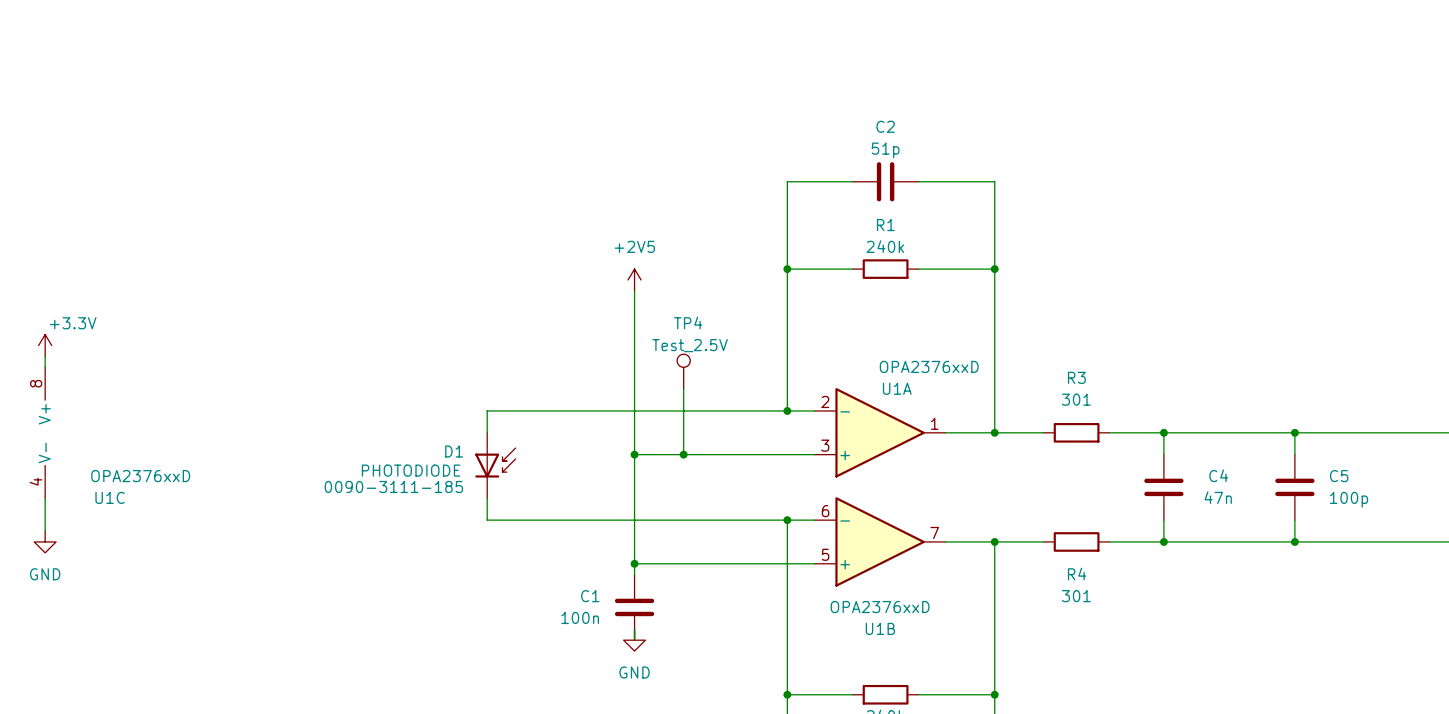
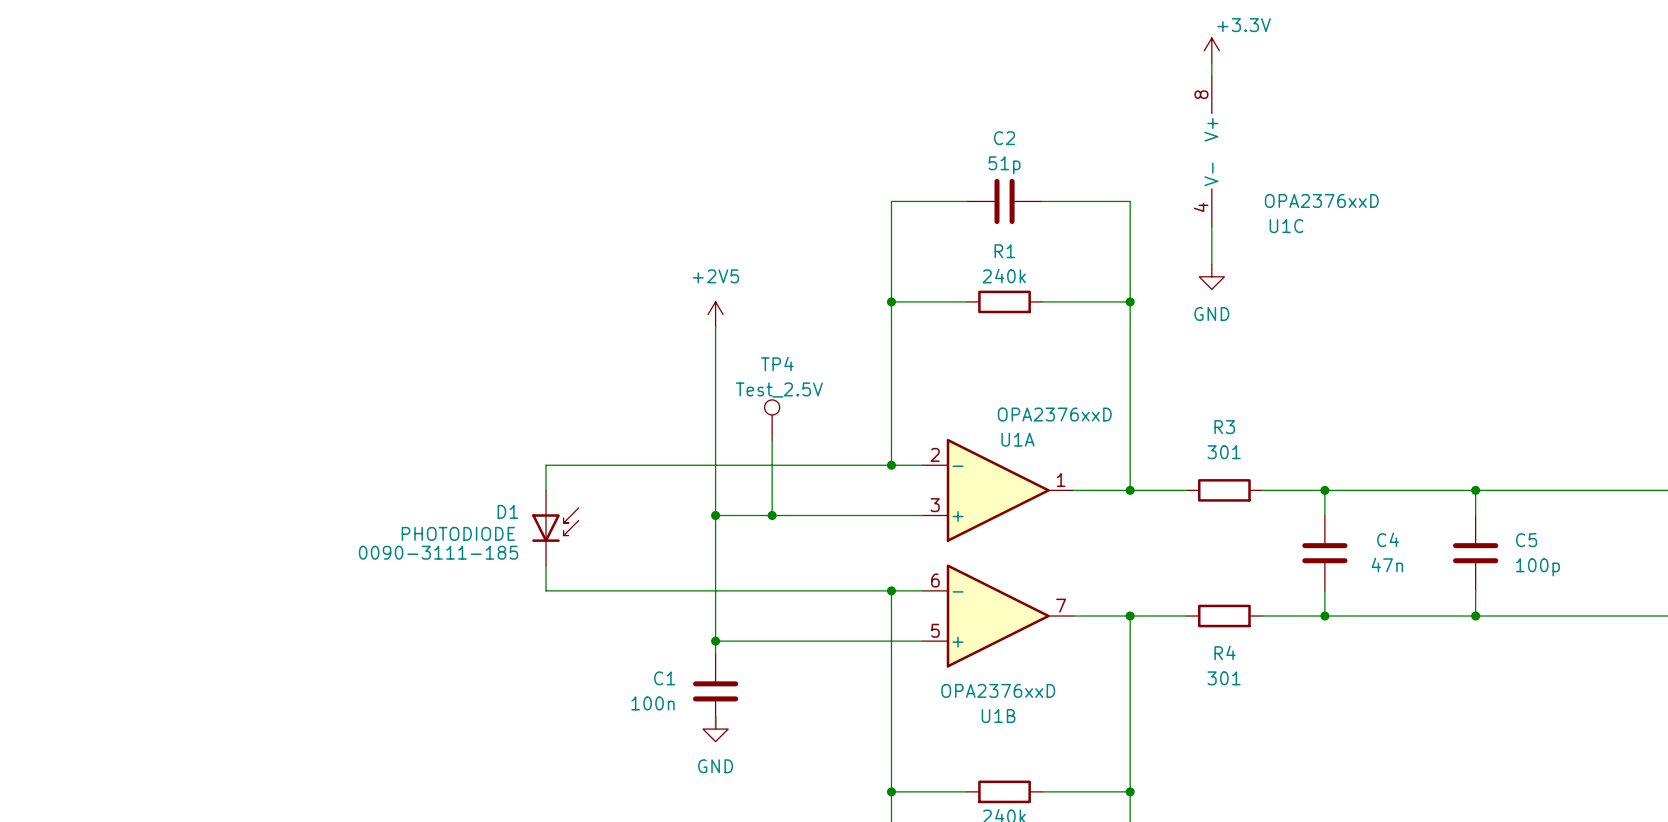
power symbol: none -> +3.3V (1211, 50)
wire: none -> (1211, 63) (1211, 75)
wire: none -> (1211, 226) (1211, 264)
power symbol: none -> GND (1211, 276)
power symbol: +3.3V (45, 345) -> none
wire: (45, 356) (45, 367) -> none
U1C position: (45, 432) -> (1211, 151)
wire: (45, 498) (45, 531) -> none
power symbol: GND (45, 541) -> none

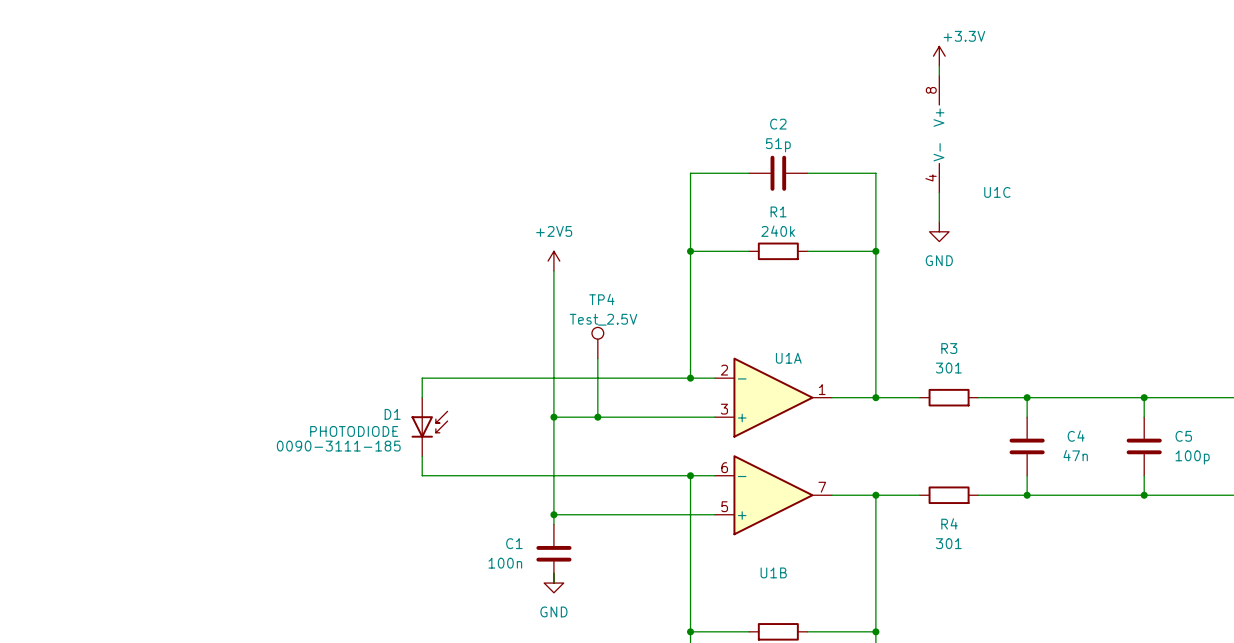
U1C value: OPA2376xxD (1321, 200) -> none
U1A value: OPA2376xxD (1054, 414) -> none
U1B value: OPA2376xxD (998, 690) -> none

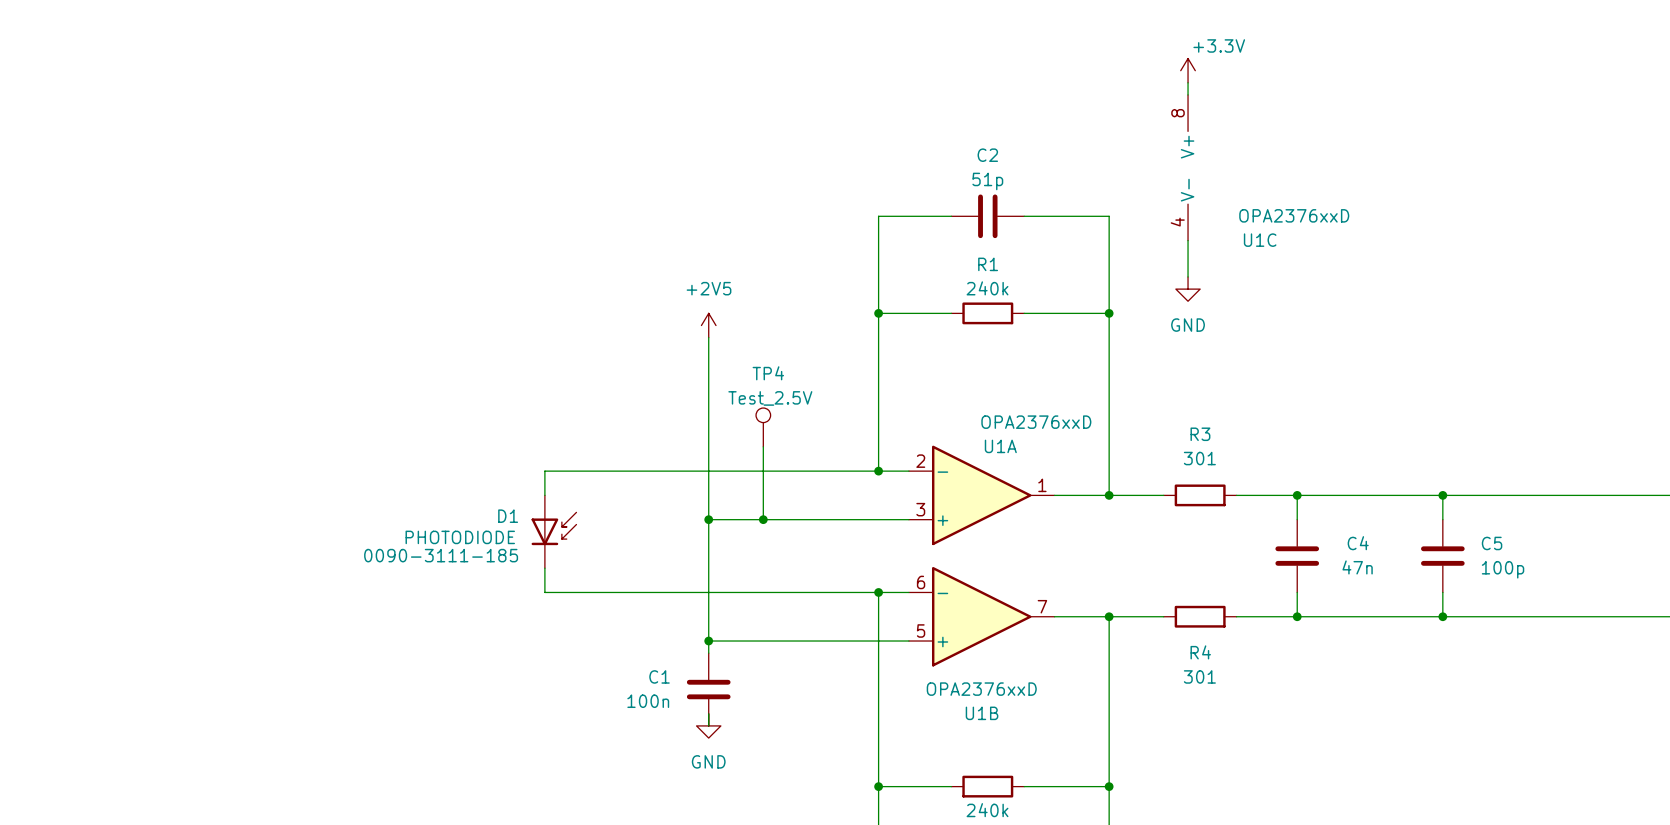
U1C value: none -> OPA2376xxD (1294, 215)
U1A value: none -> OPA2376xxD (1036, 422)
U1B value: none -> OPA2376xxD (981, 689)

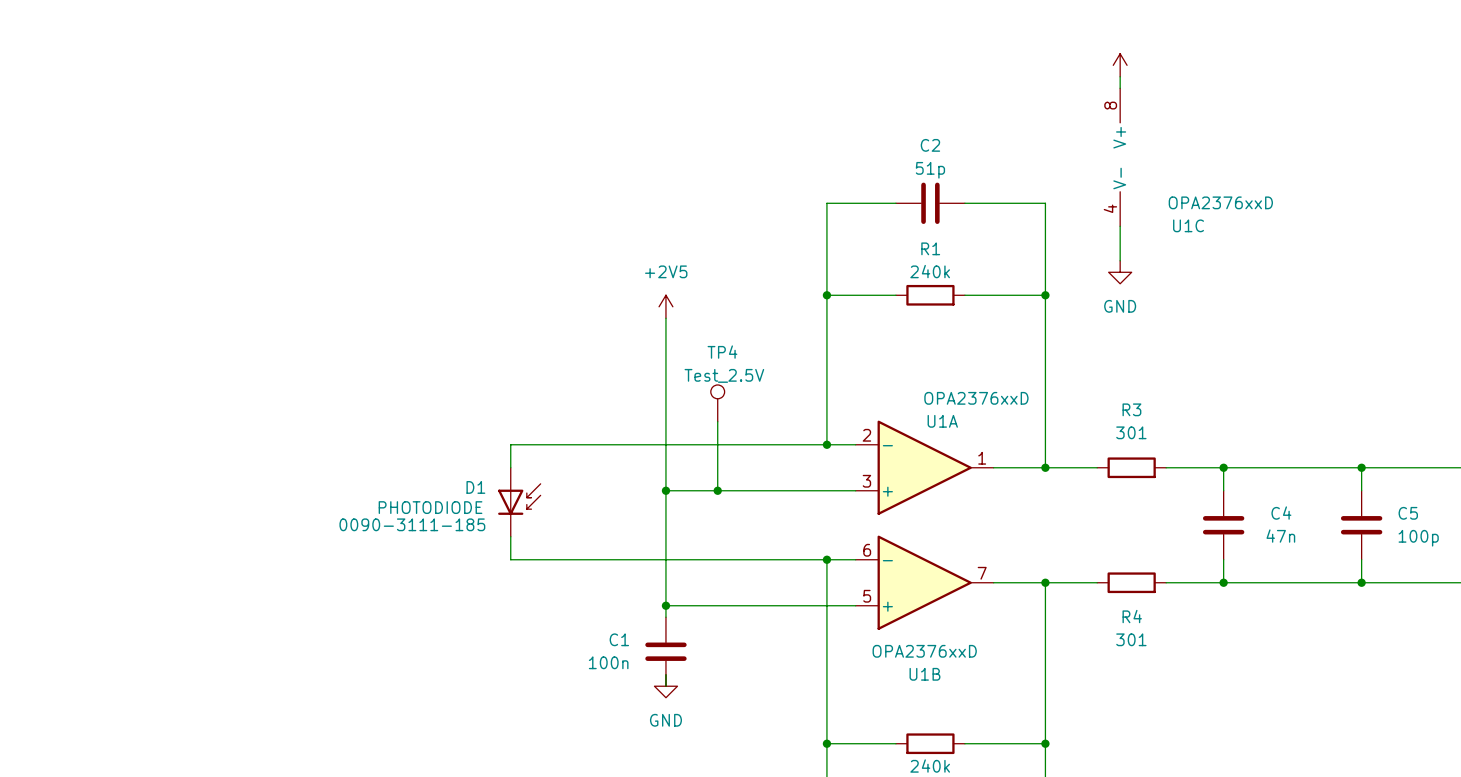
power symbol text: +3.3V (1219, 45) -> none

